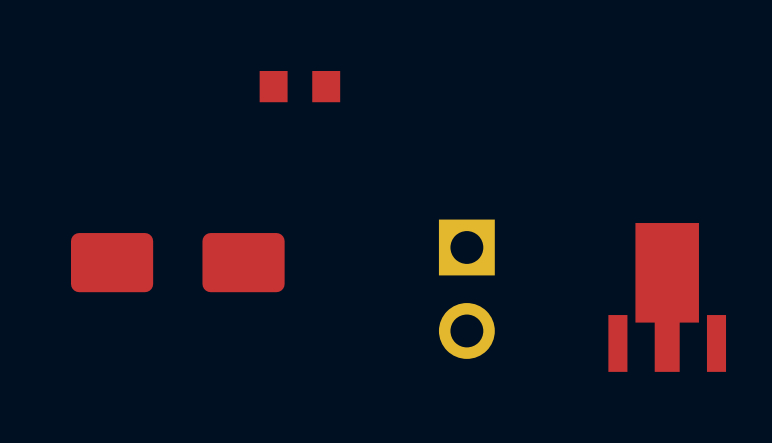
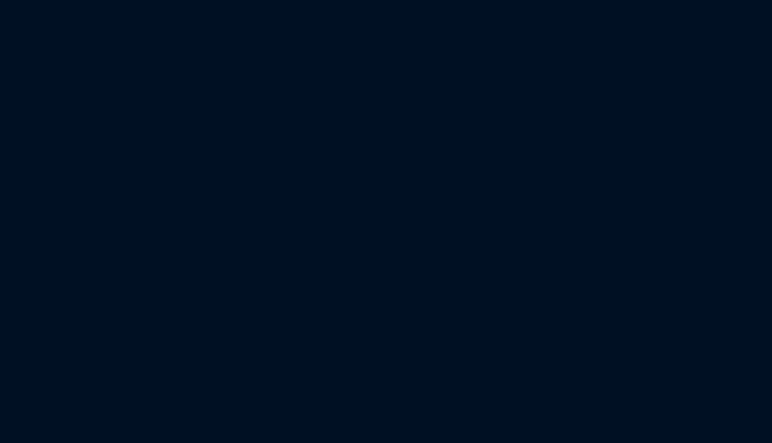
part: (299, 86) -> none
part: (177, 262) -> none
part: (466, 289) -> none
part: (667, 297) -> none

